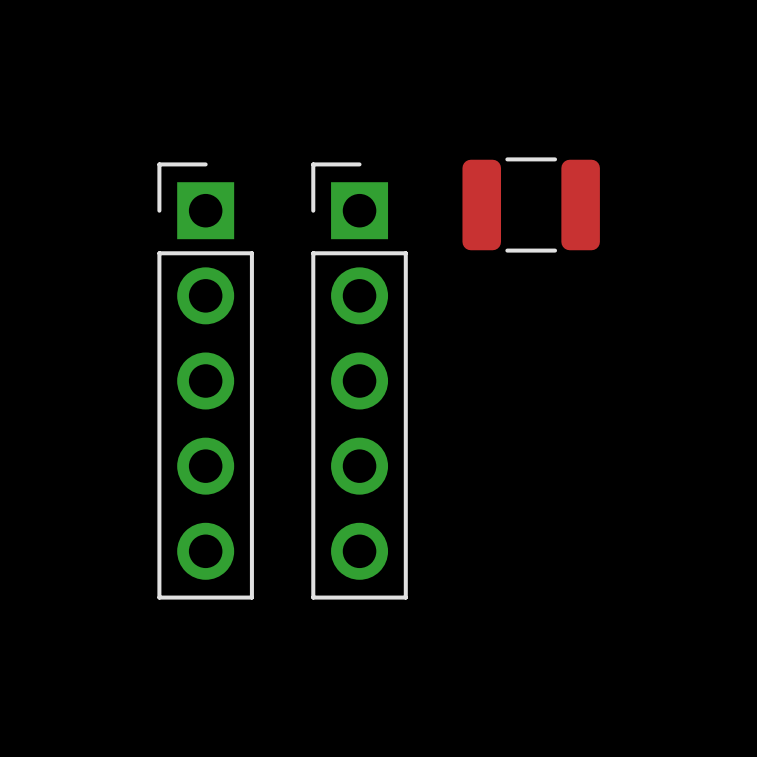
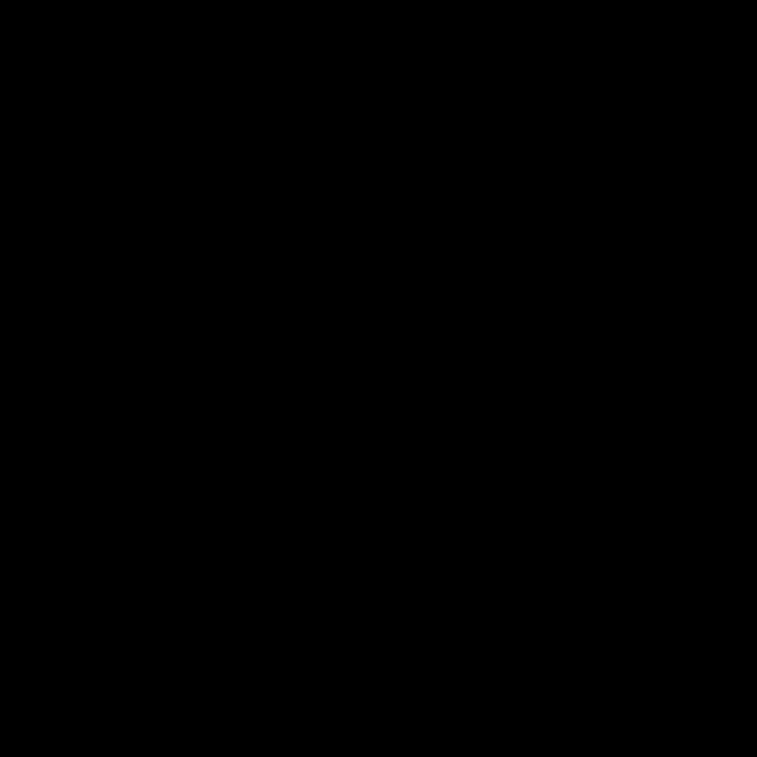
part: (531, 204) -> none
part: (205, 381) -> none
part: (359, 381) -> none

